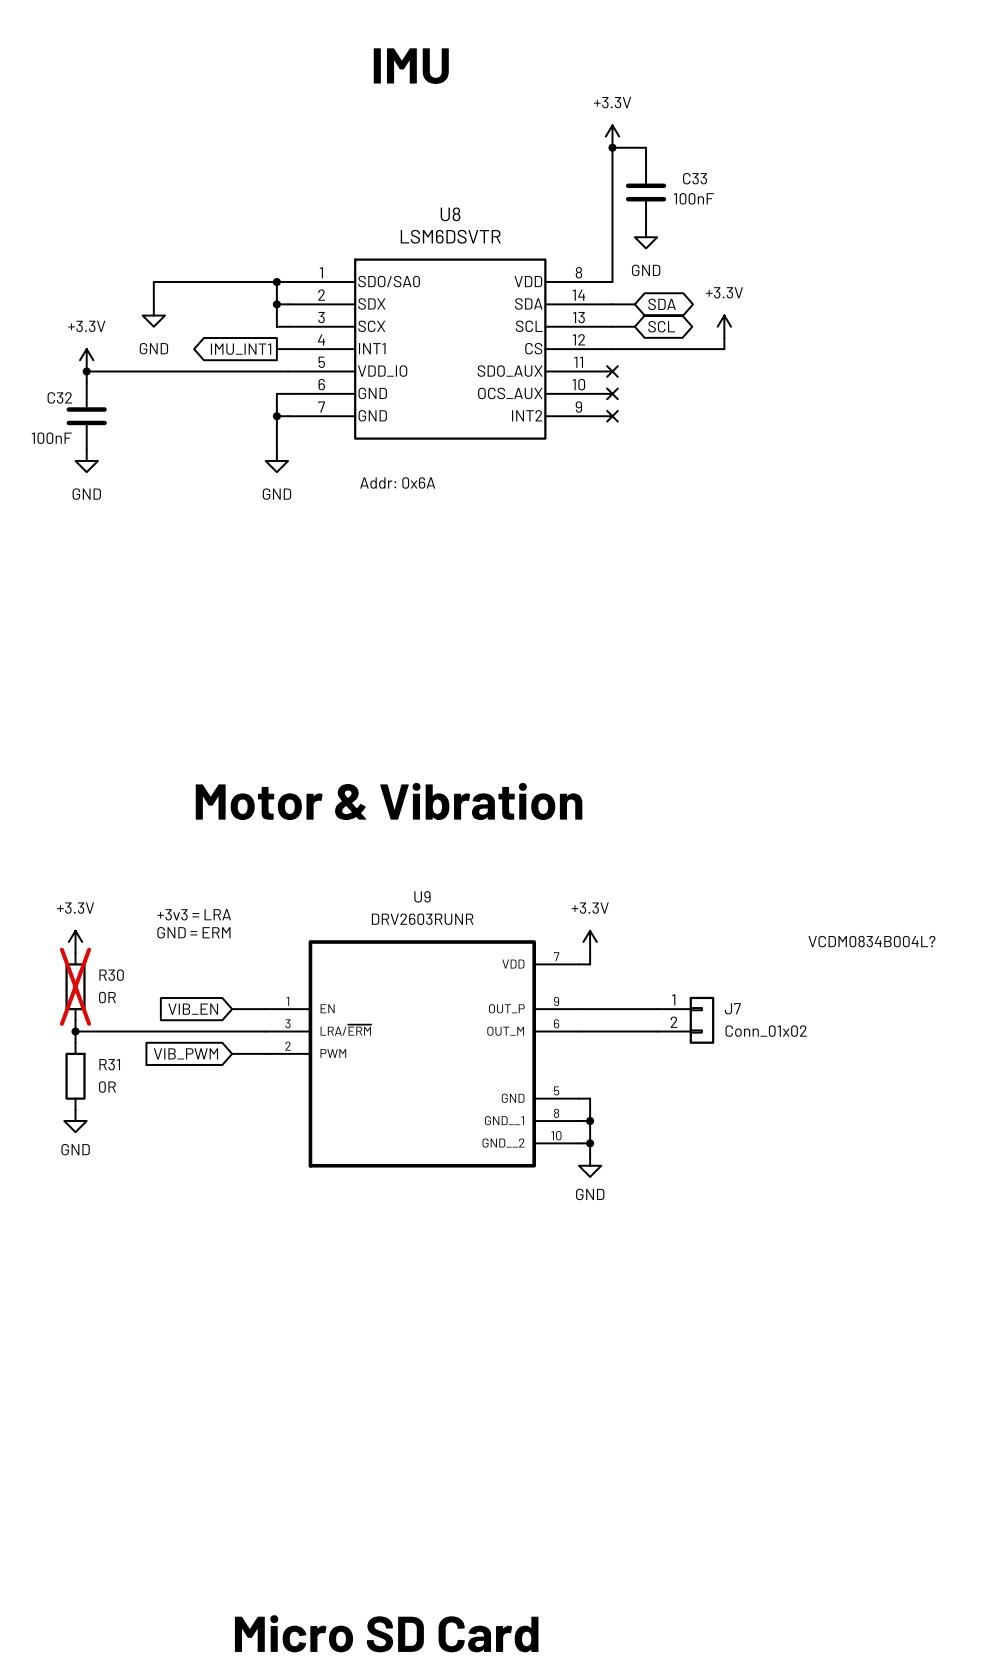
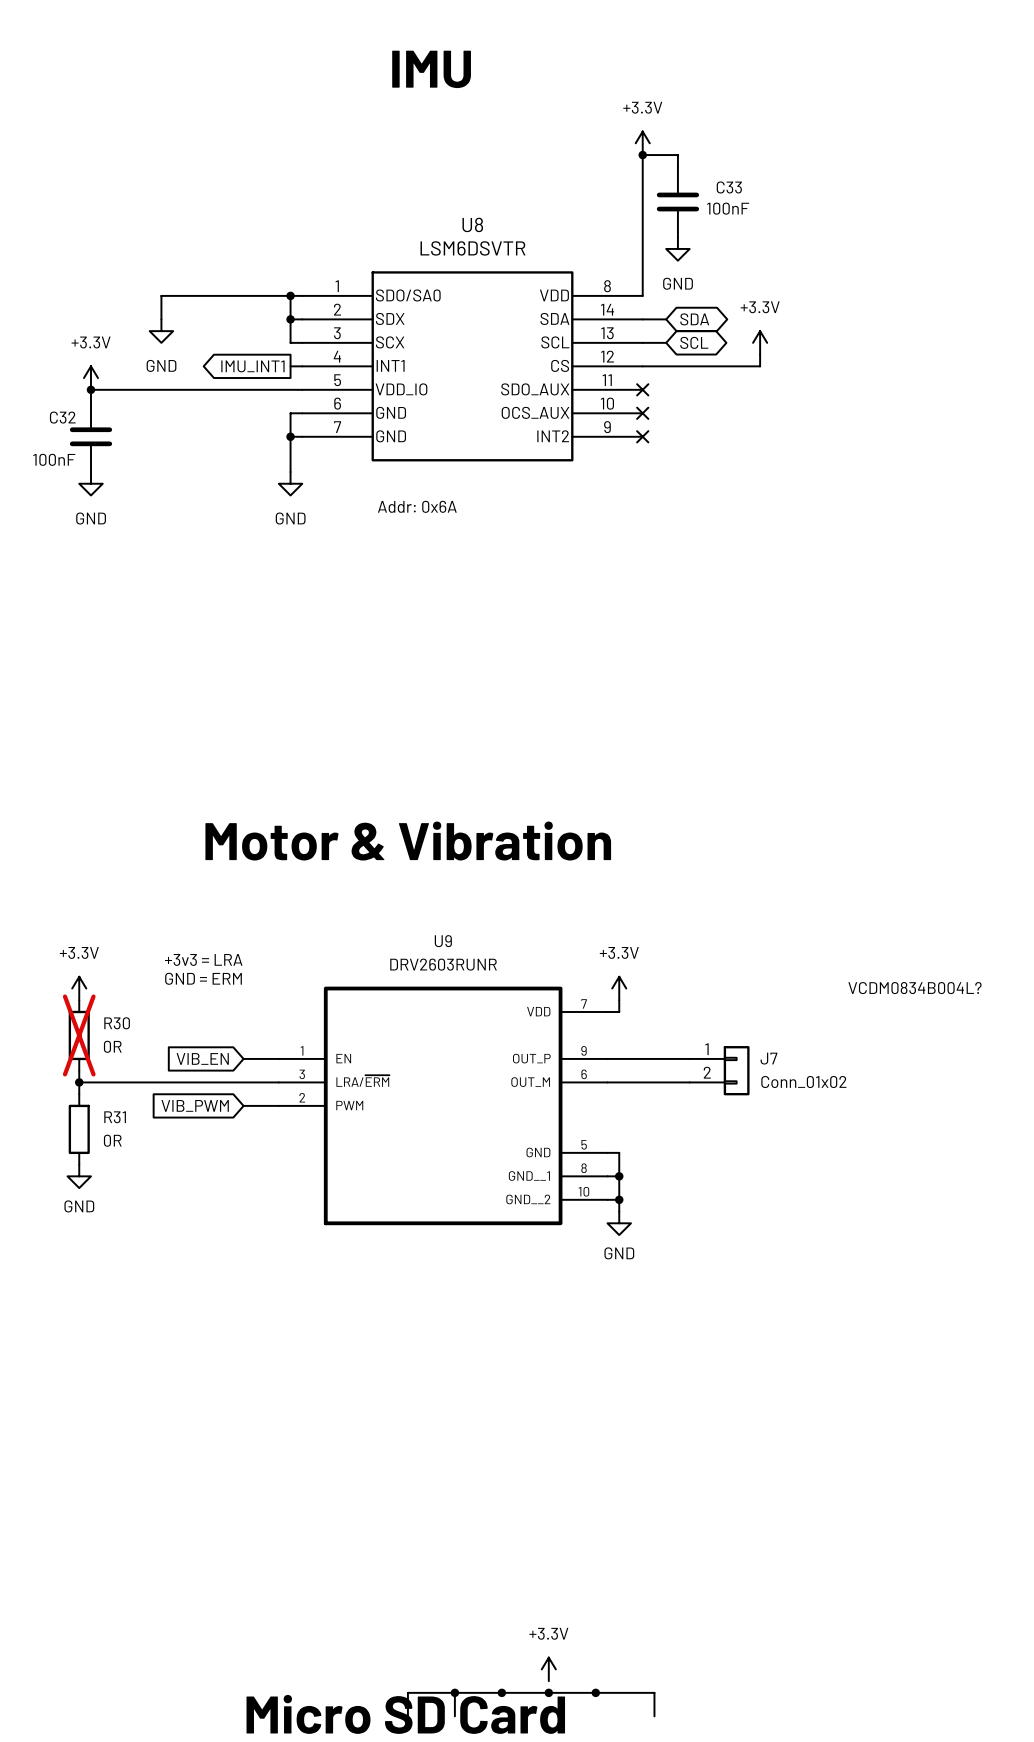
power symbol: none -> +3.3V (548, 1669)
wire: none -> (454, 1692) (454, 1716)
junction: none -> (454, 1692)
junction: none -> (501, 1692)
junction: none -> (548, 1692)
junction: none -> (595, 1692)
wire: none -> (407, 1716) (407, 1692) (654, 1692) (654, 1716)

